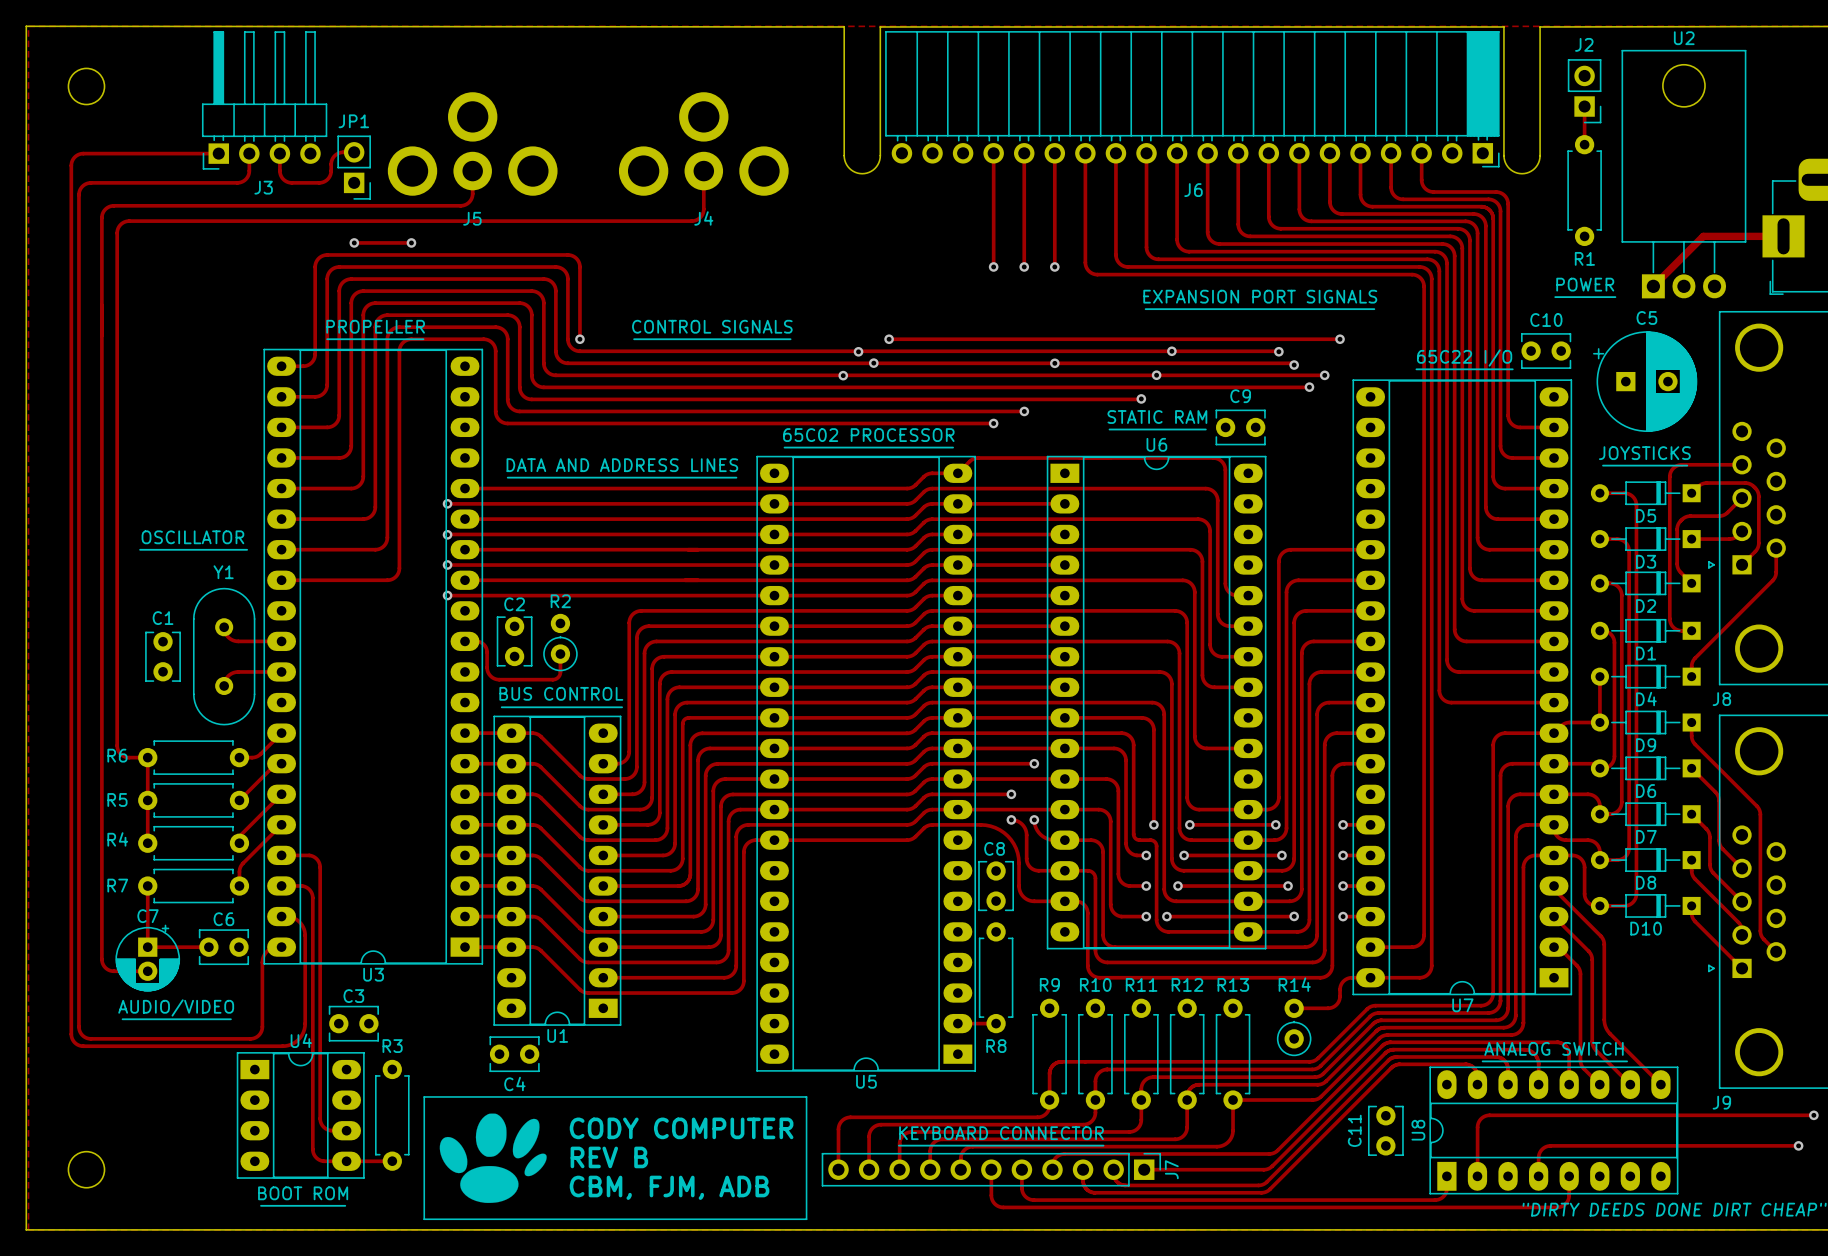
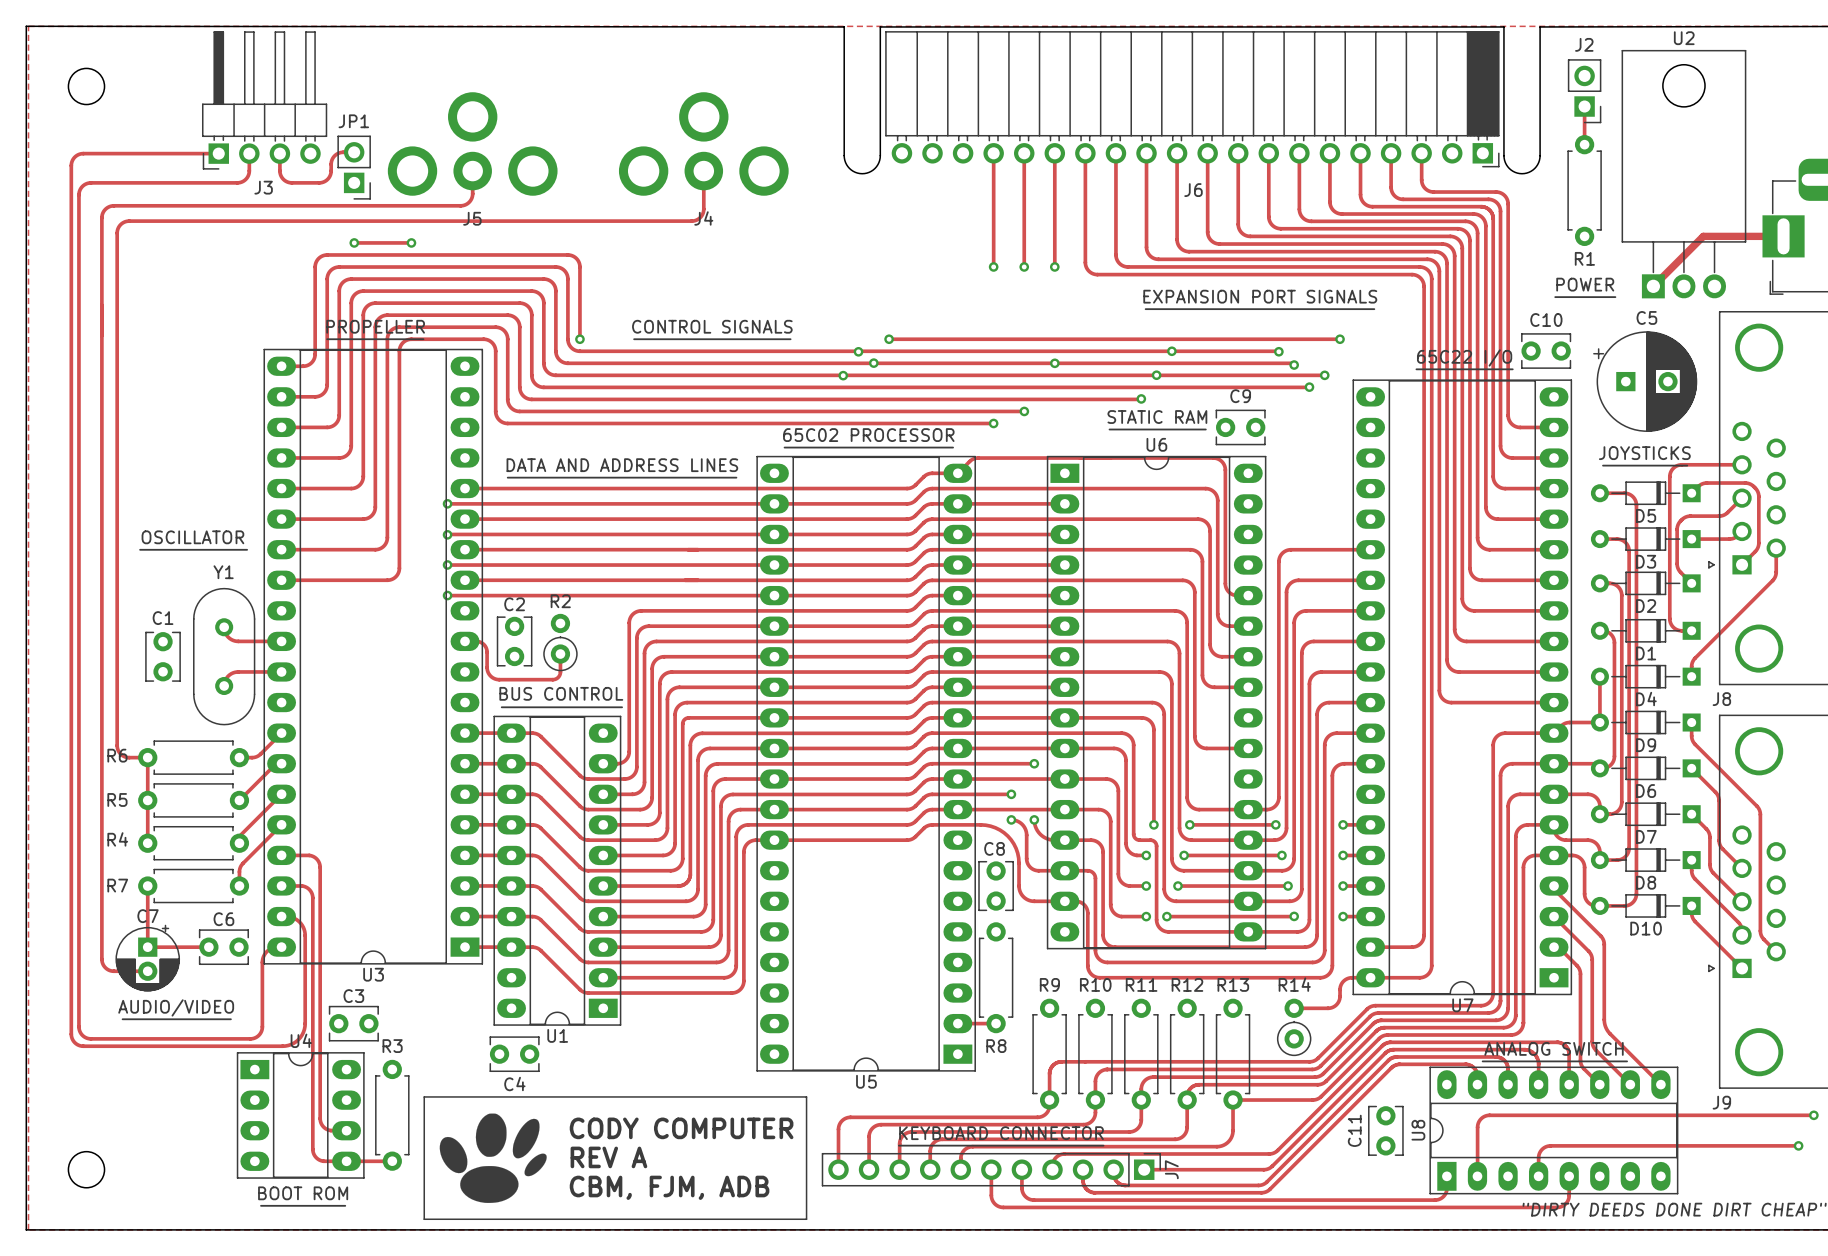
text: REV B (609, 1157) -> REV A (608, 1157)

